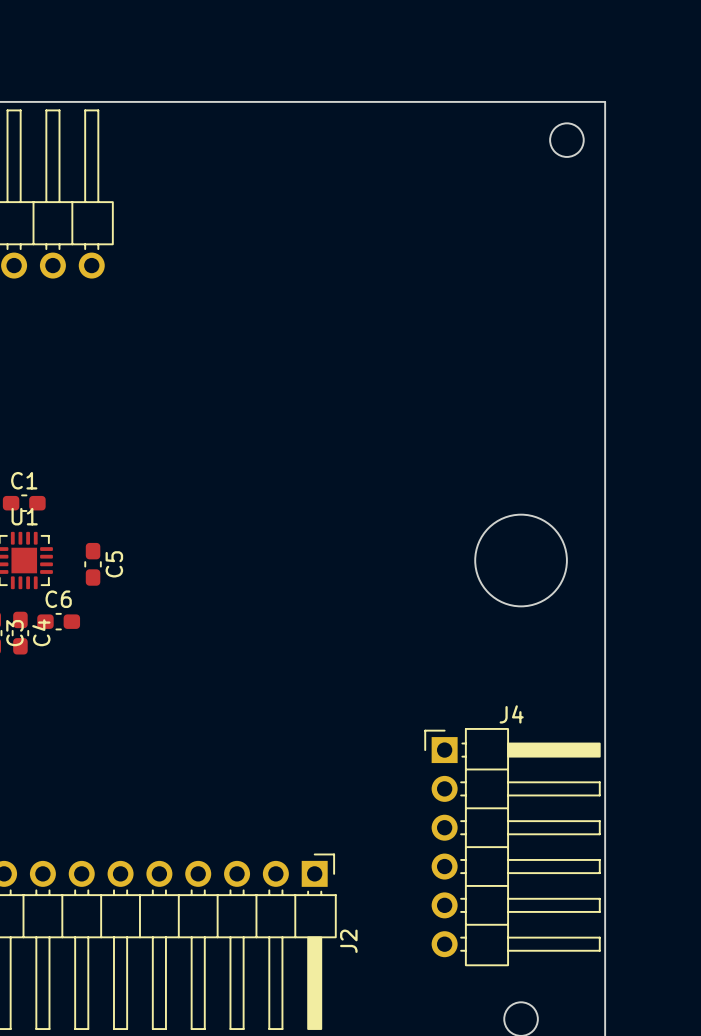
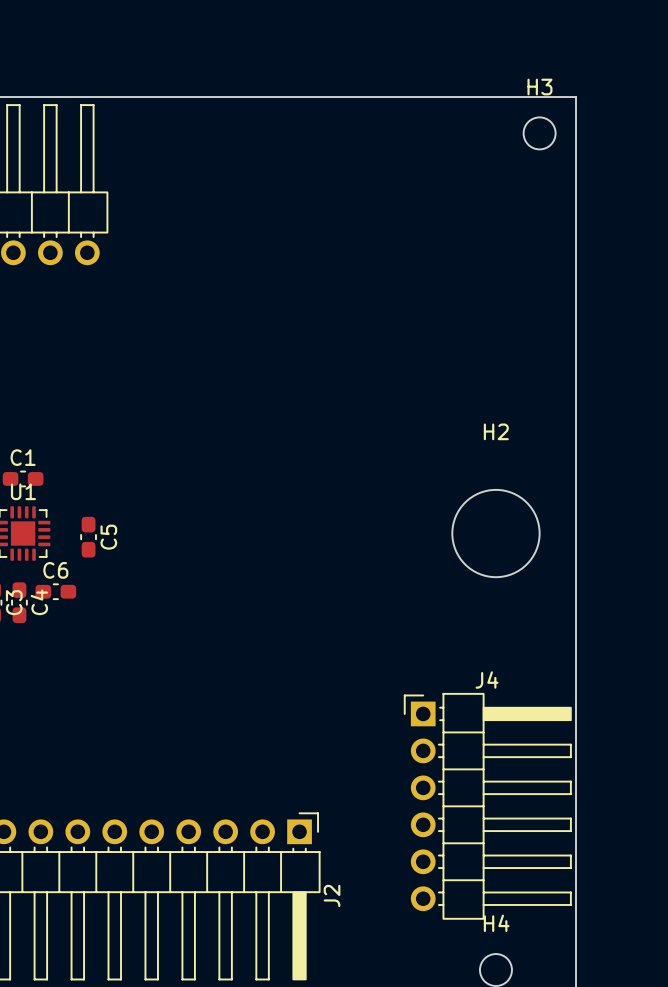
H3 name: none -> H3 (539, 87)
H2 name: none -> H2 (496, 431)
H4 name: none -> H4 (496, 923)

